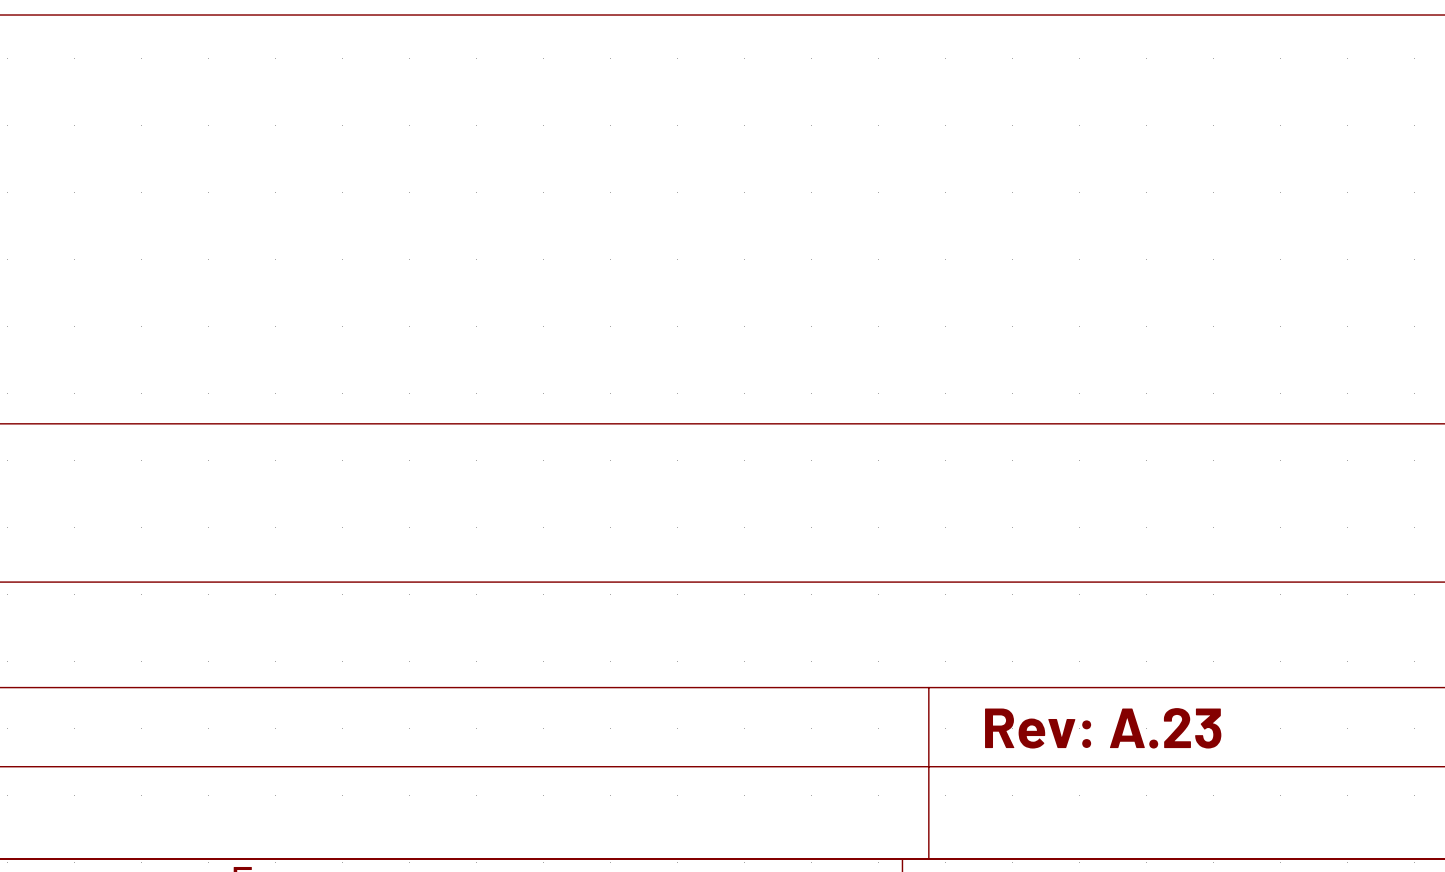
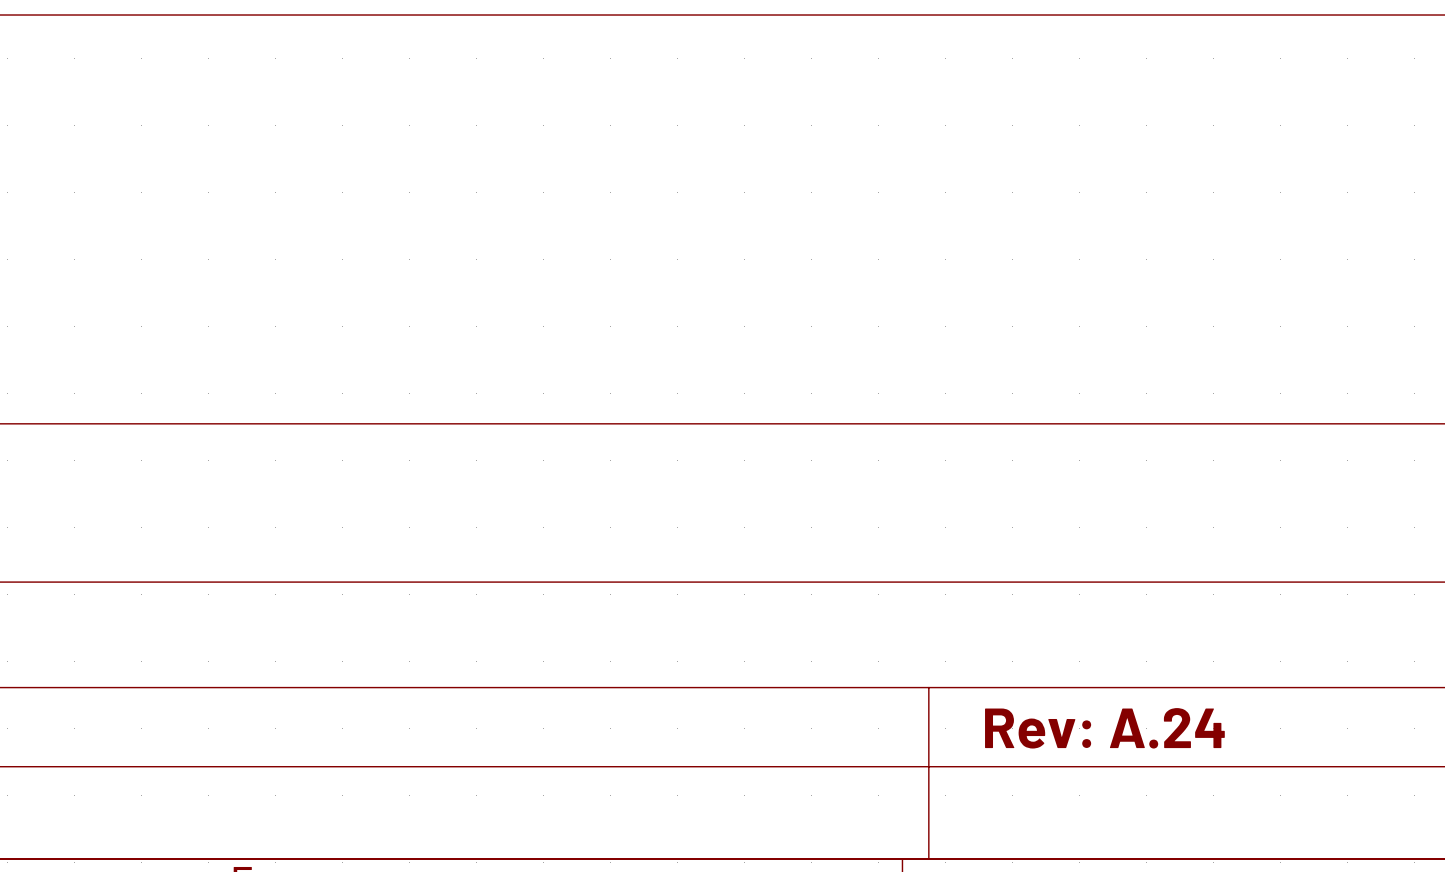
title block: Rev: A.23 (1103, 728) -> Rev: A.24 (1104, 728)

